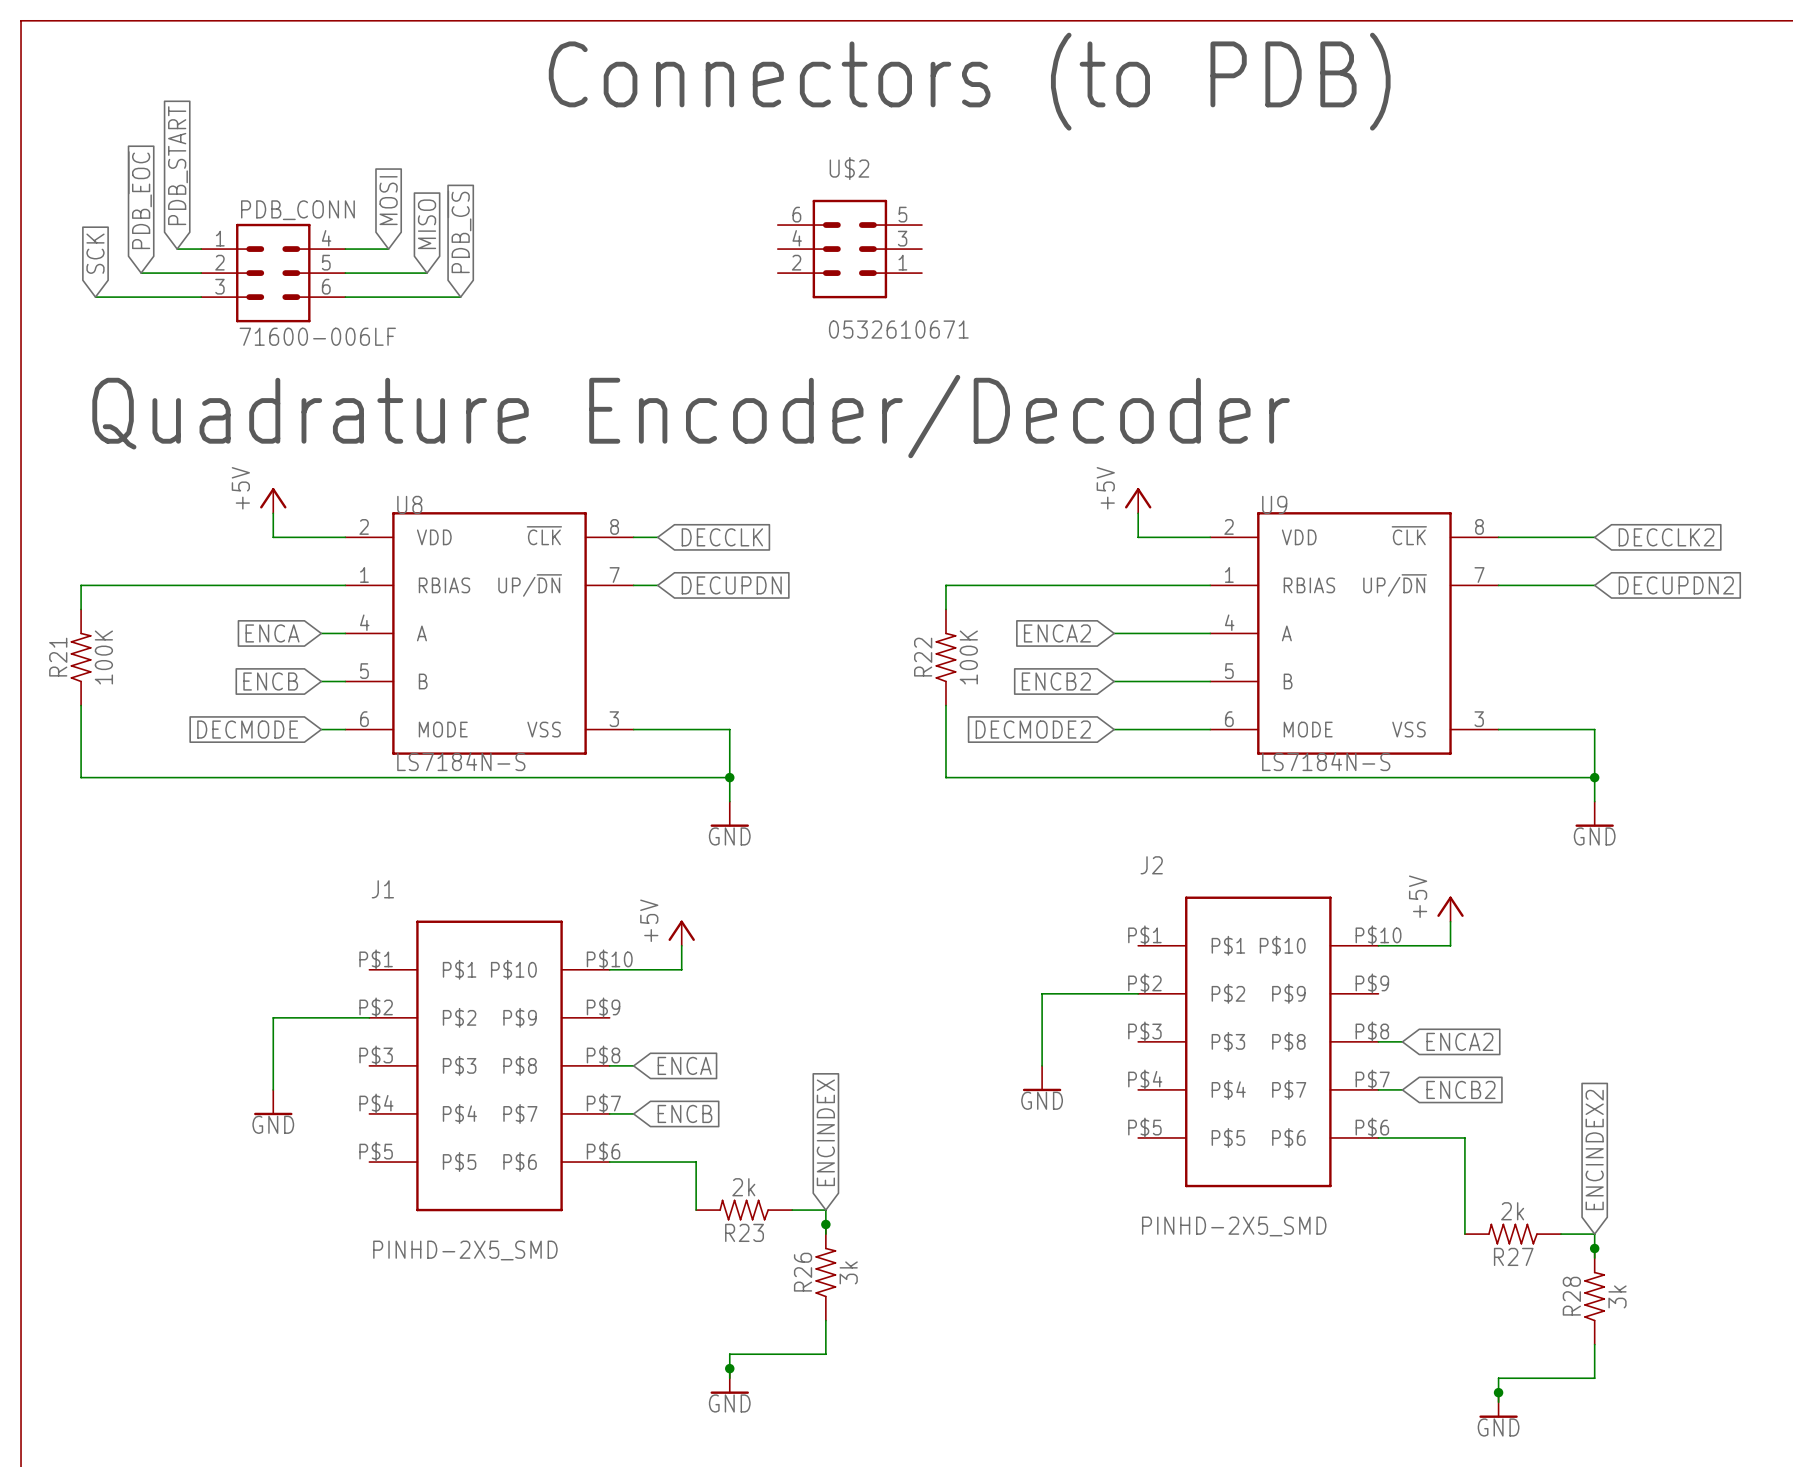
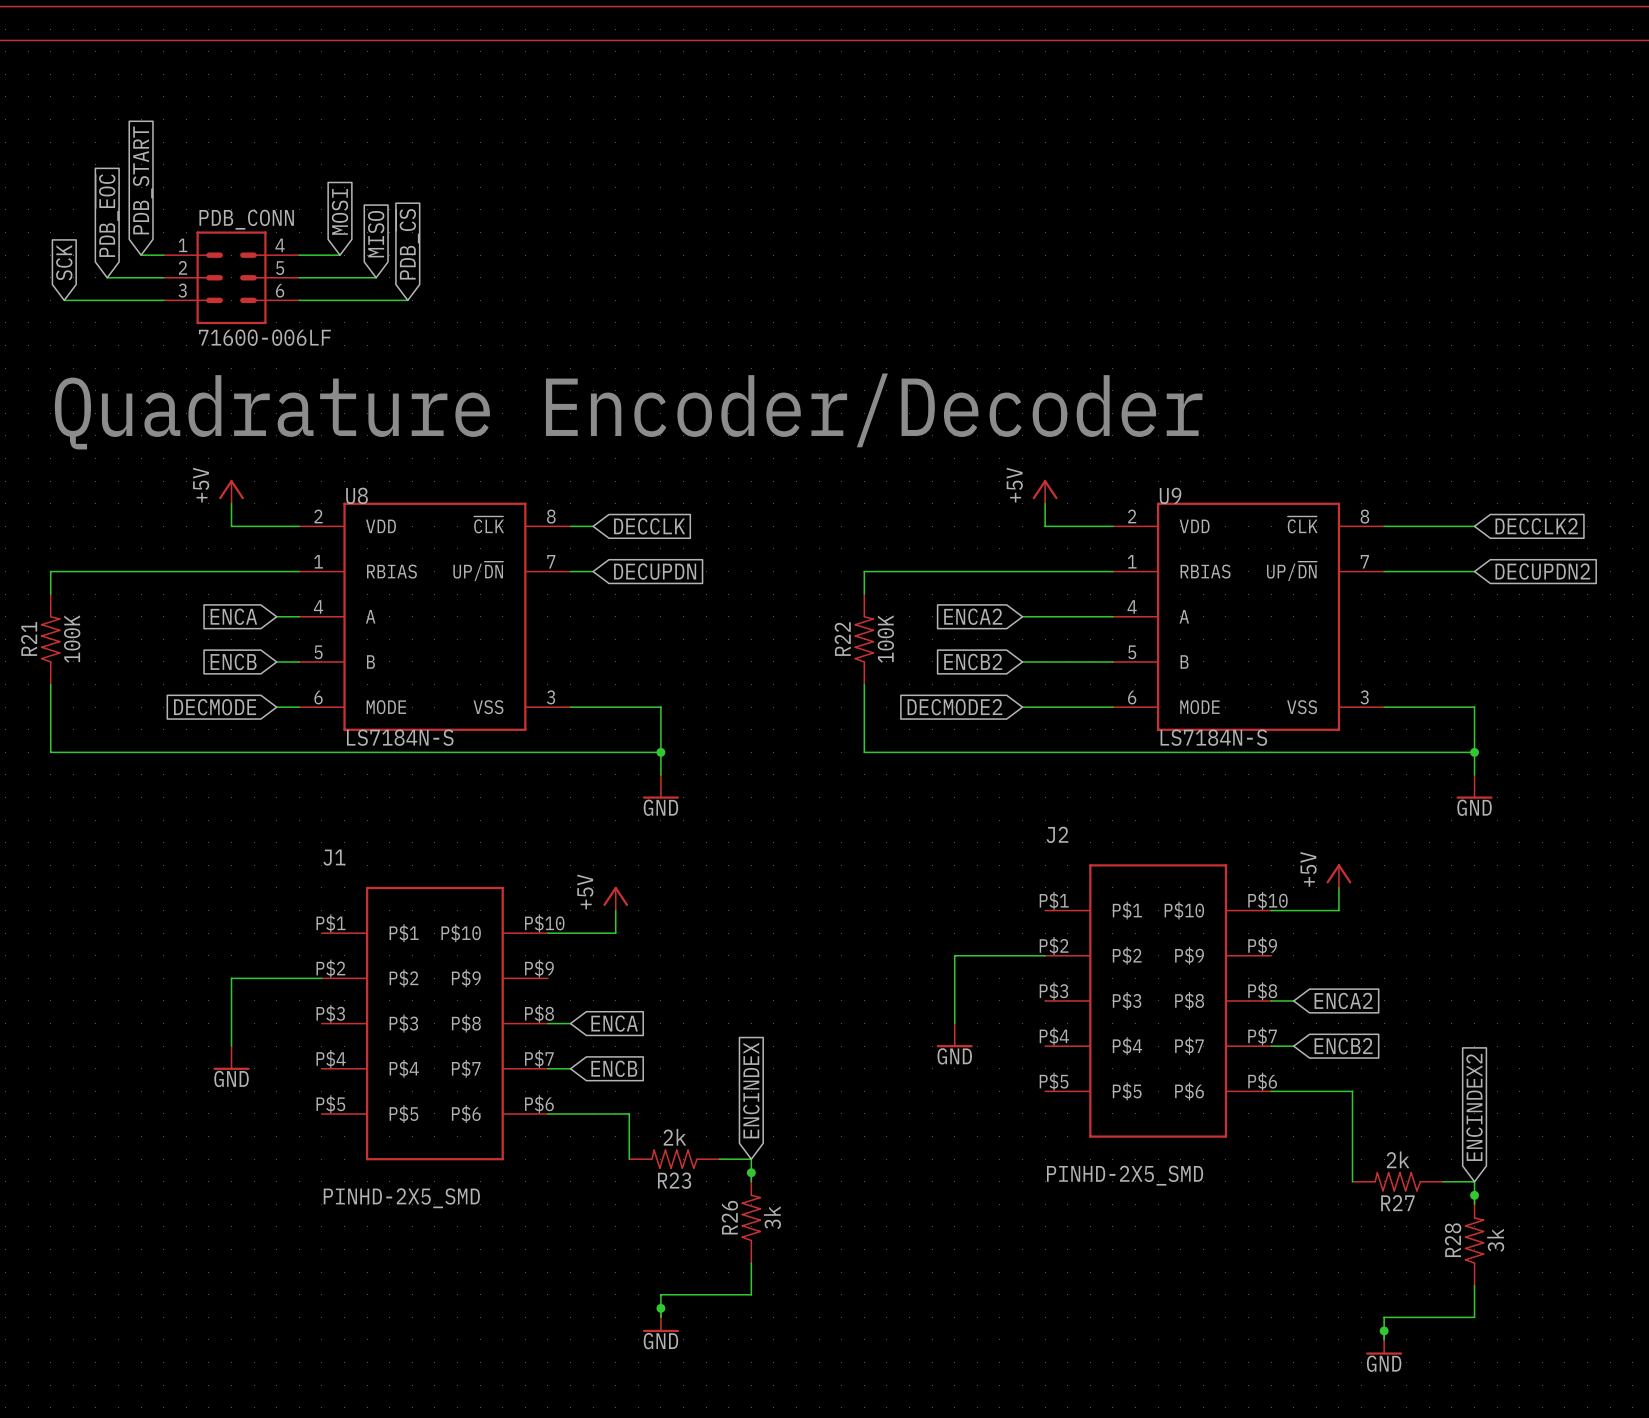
text: Connectors (to PDB) (969, 81) -> none
U$2: 0532610671 (849, 249) -> none

